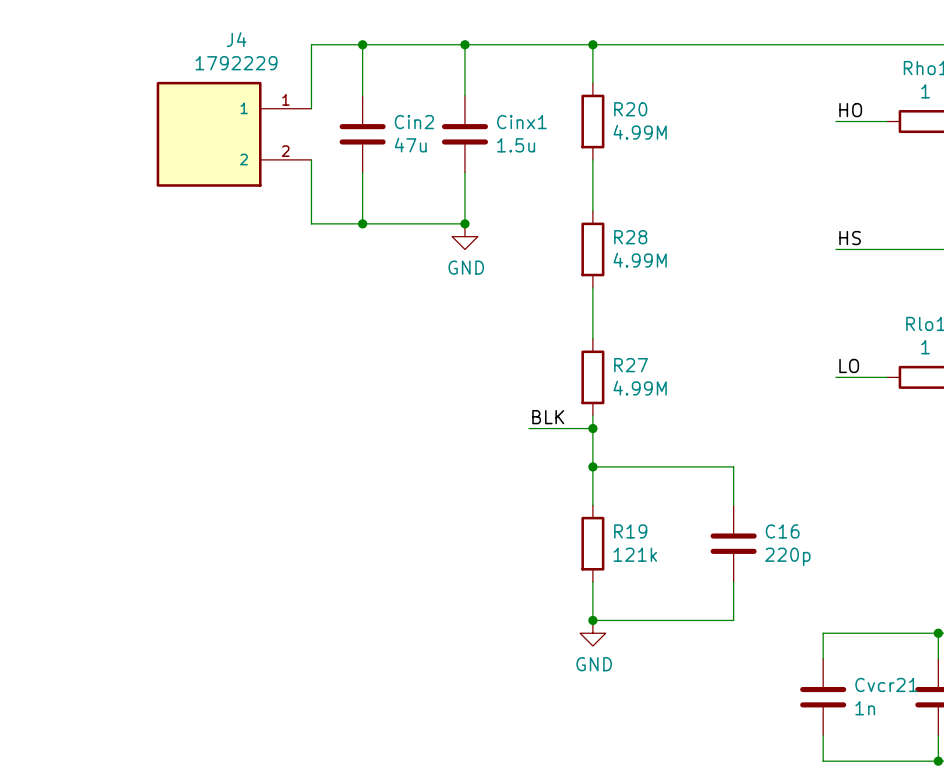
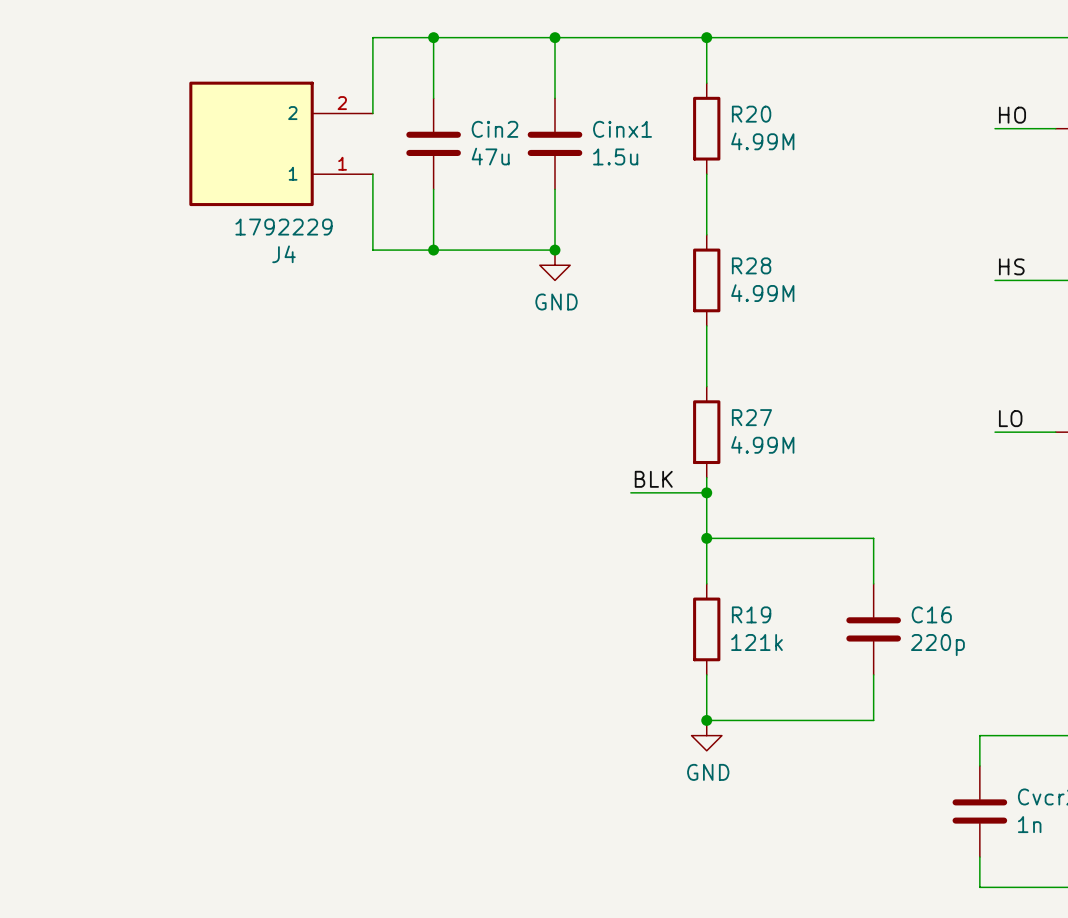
J4 flip: as is (209, 134) -> up-down (251, 143)

